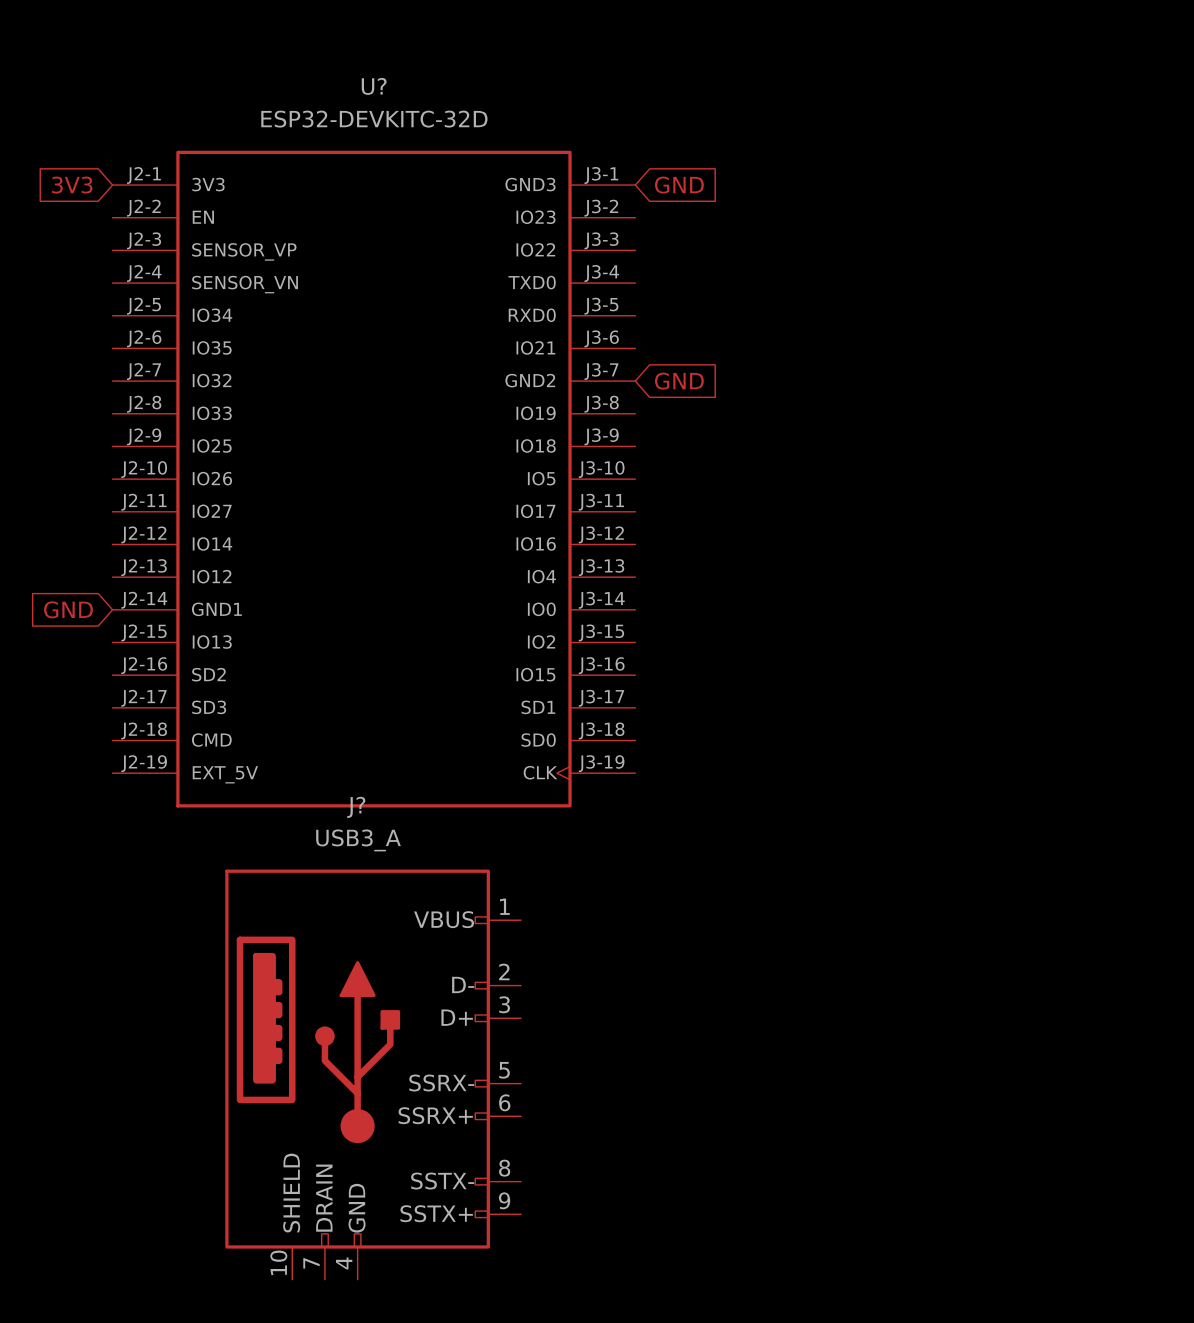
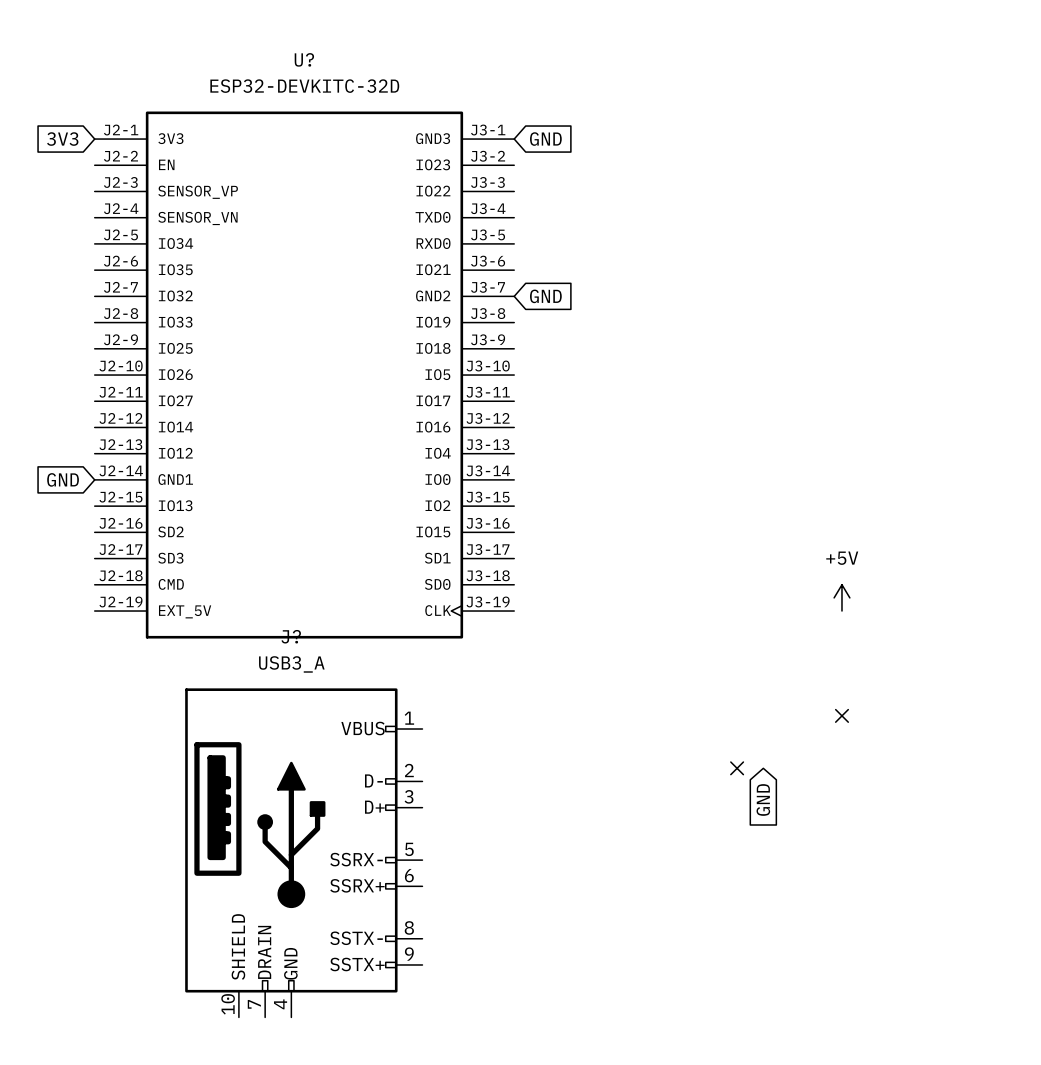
power symbol: none -> +5V (841, 597)
no-connect mark: none -> (841, 715)
no-connect mark: none -> (737, 768)
global label: none -> GND (763, 799)

